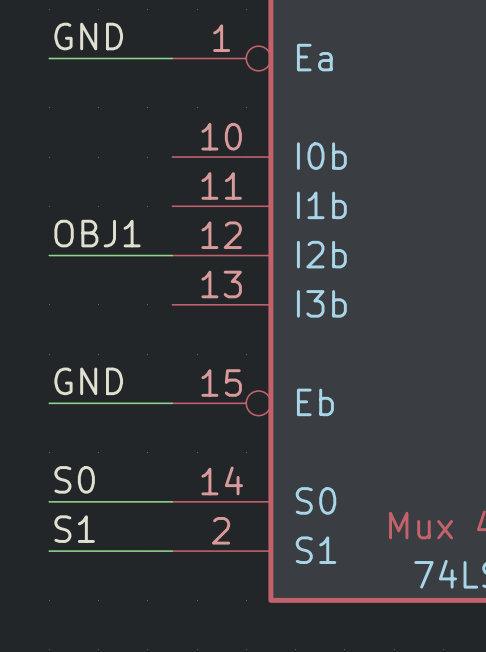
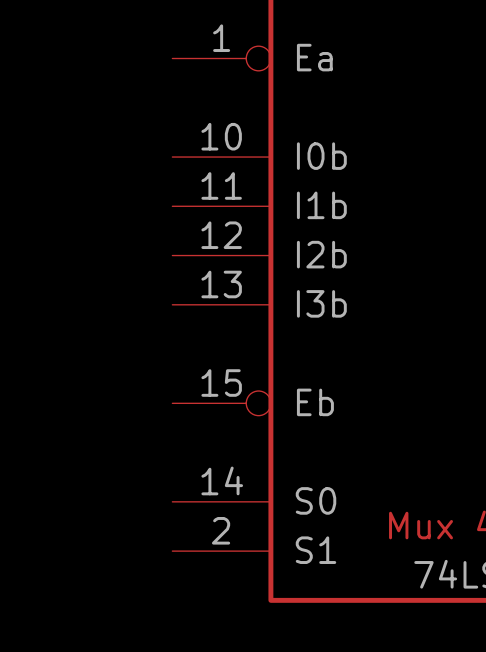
label: GND (88, 36) -> none
wire: (49, 58) (172, 58) -> none
label: OBJ1 (97, 233) -> none
wire: (49, 255) (172, 255) -> none
label: GND (88, 381) -> none
wire: (49, 403) (172, 403) -> none
label: S0 (74, 479) -> none
wire: (49, 501) (172, 501) -> none
label: S1 (74, 529) -> none
wire: (49, 551) (172, 551) -> none

